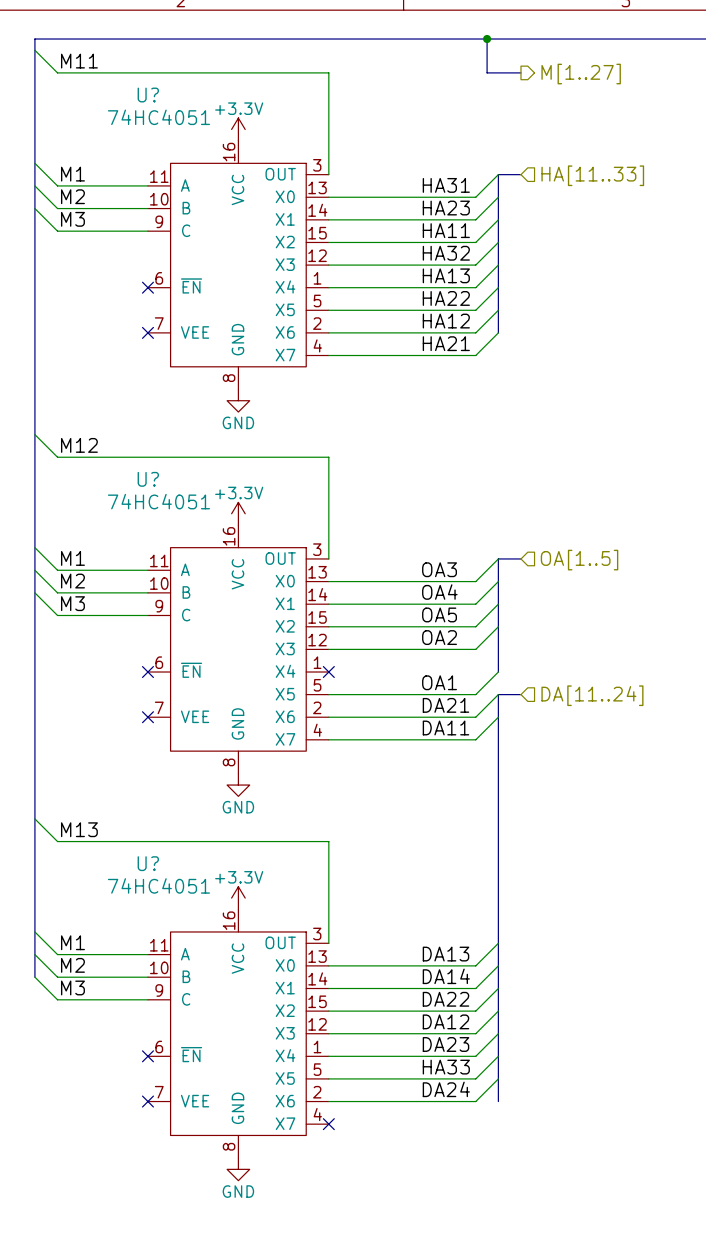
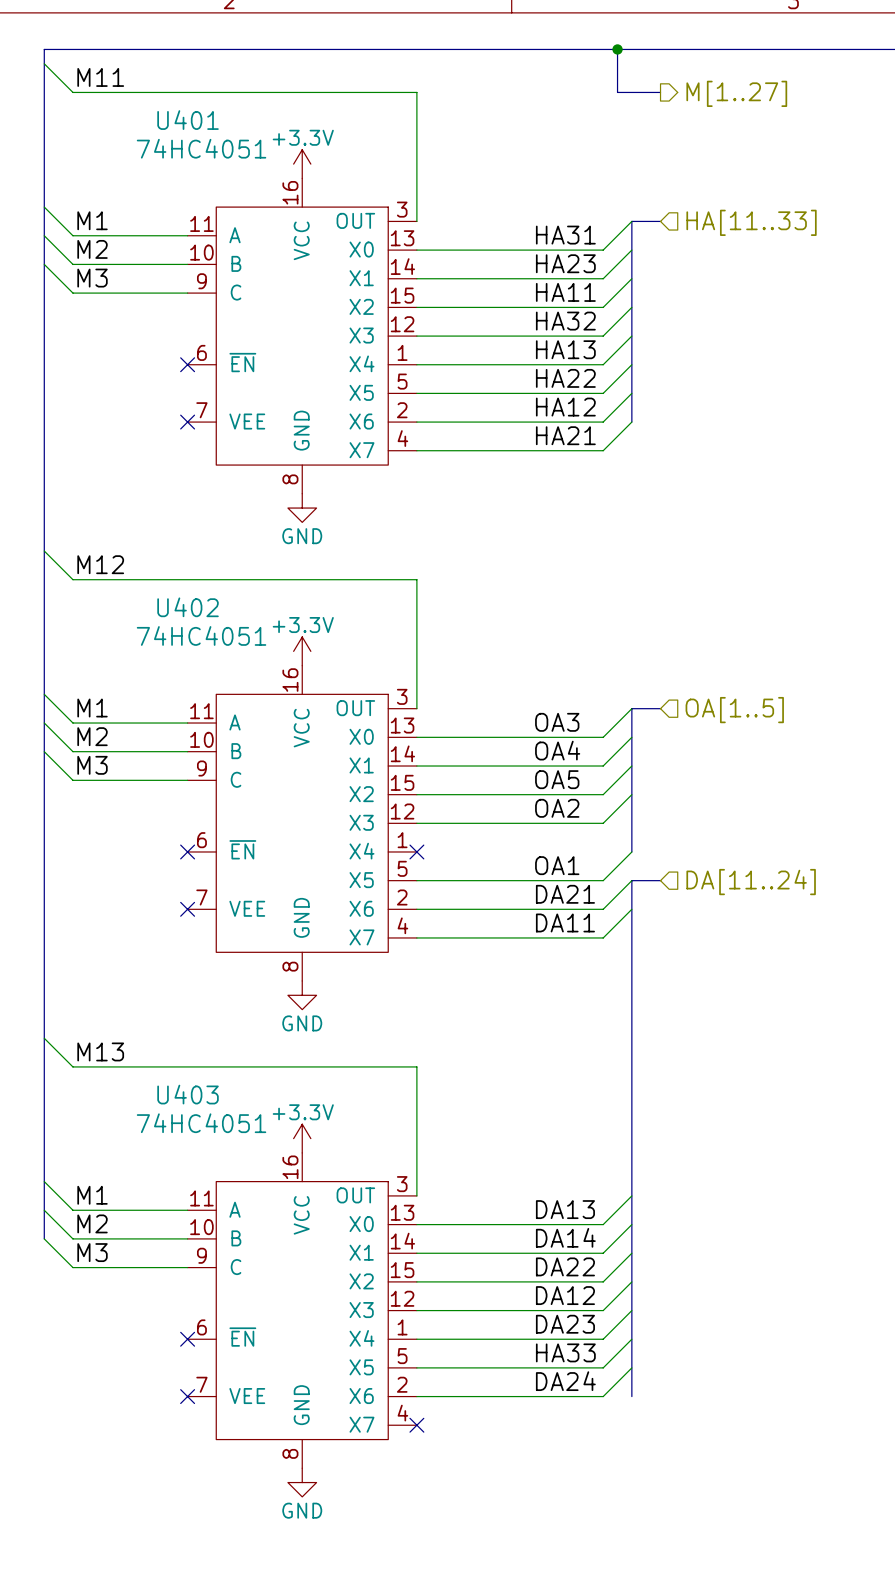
U? name: U? (148, 95) -> U401 (188, 120)
U? name: U? (148, 479) -> U402 (188, 607)
U? name: U? (148, 863) -> U403 (188, 1094)

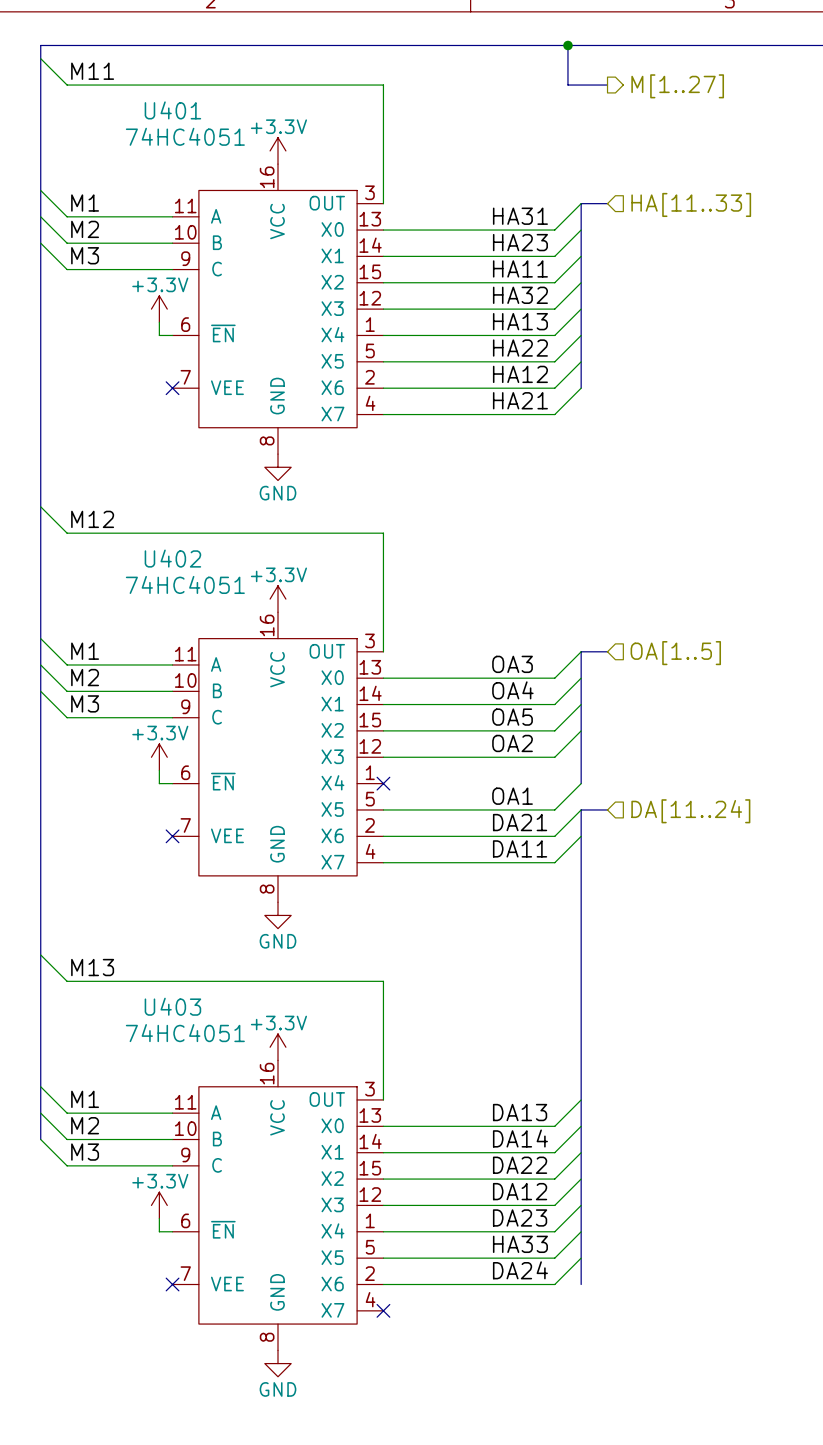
power symbol: none -> +3.3V (159, 309)
wire: none -> (159, 322) (159, 335) (172, 335)
no-connect mark: (187, 364) -> none
power symbol: none -> +3.3V (159, 757)
wire: none -> (159, 770) (159, 783) (172, 783)
no-connect mark: (187, 851) -> none
power symbol: none -> +3.3V (159, 1205)
wire: none -> (159, 1218) (159, 1231) (172, 1231)
no-connect mark: (187, 1339) -> none

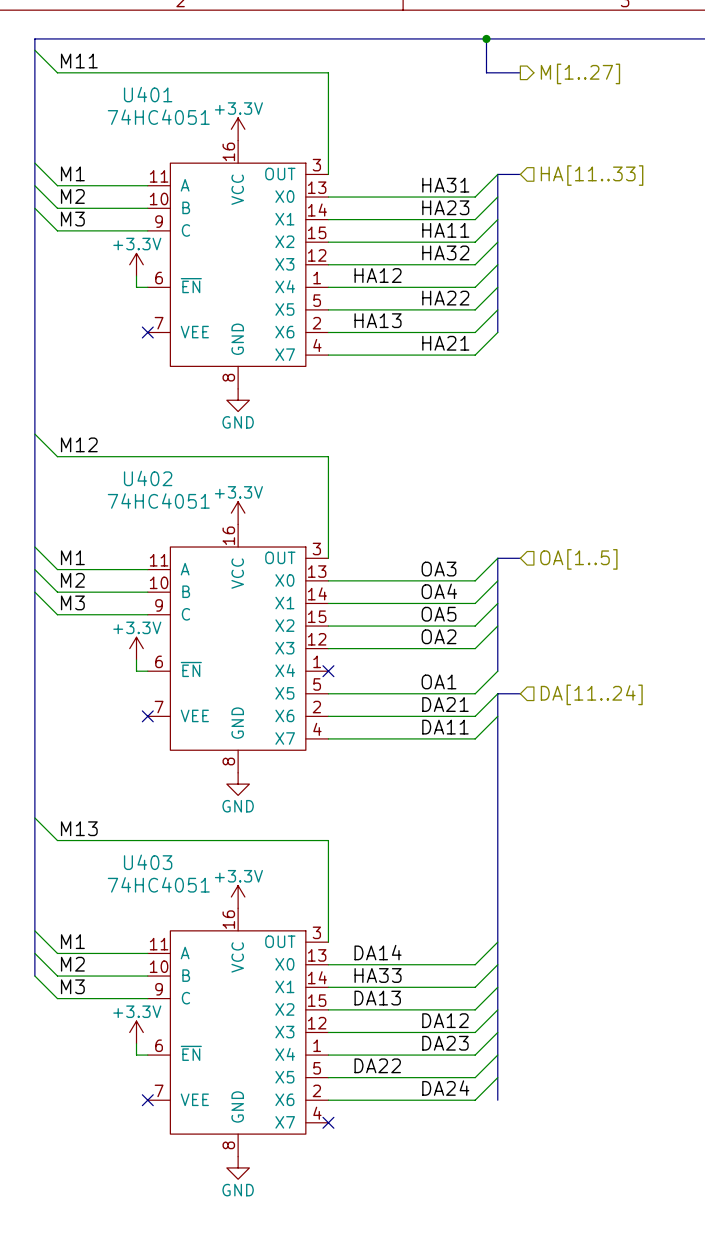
label position: HA13 (520, 321) -> HA13 (378, 320)
label position: HA12 (520, 374) -> HA12 (378, 275)
label position: DA13 (520, 1112) -> DA13 (377, 998)
label position: DA14 (520, 1138) -> DA14 (378, 952)
label position: DA22 (520, 1165) -> DA22 (377, 1065)
label position: HA33 (520, 1244) -> HA33 (378, 975)

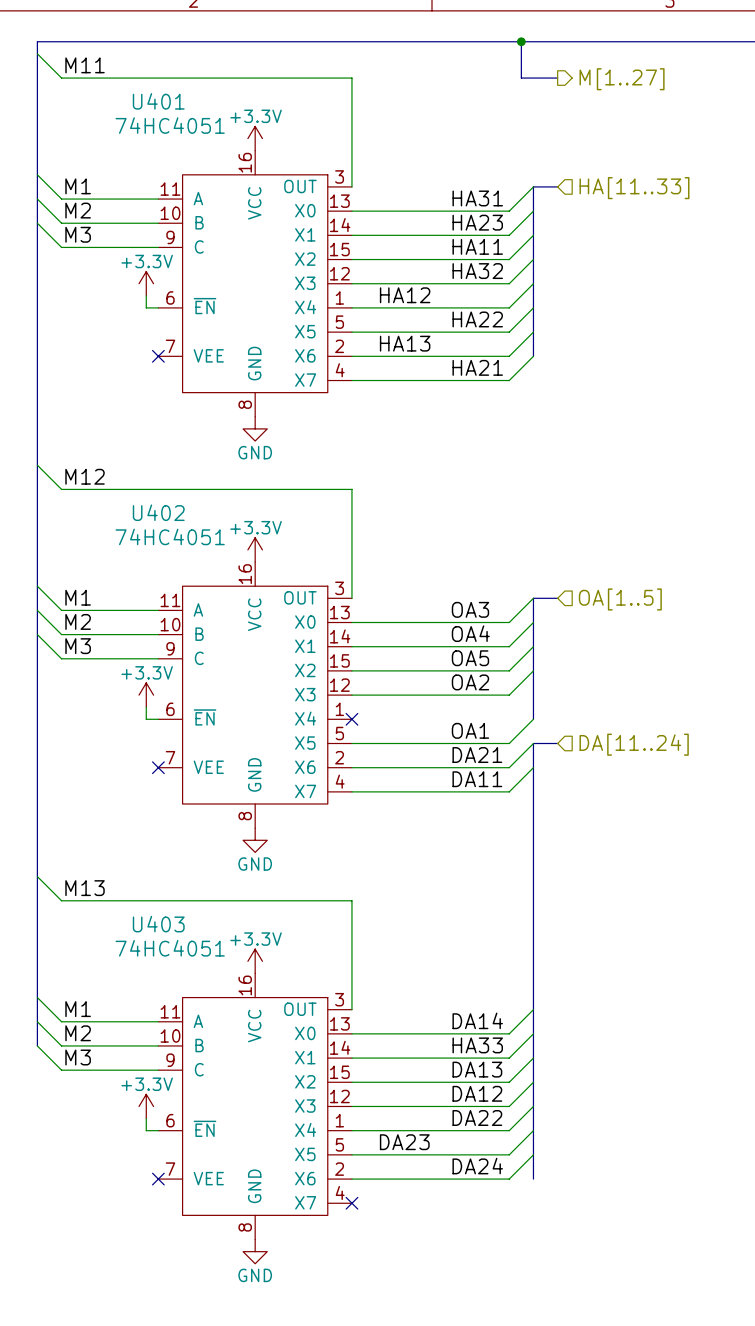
label position: DA14 (378, 952) -> DA14 (477, 1020)
label position: HA33 (378, 975) -> HA33 (477, 1045)
label position: DA13 (377, 998) -> DA13 (477, 1069)
label: DA23 (445, 1043) -> DA22 (477, 1118)
label: DA22 (377, 1065) -> DA23 (404, 1142)

